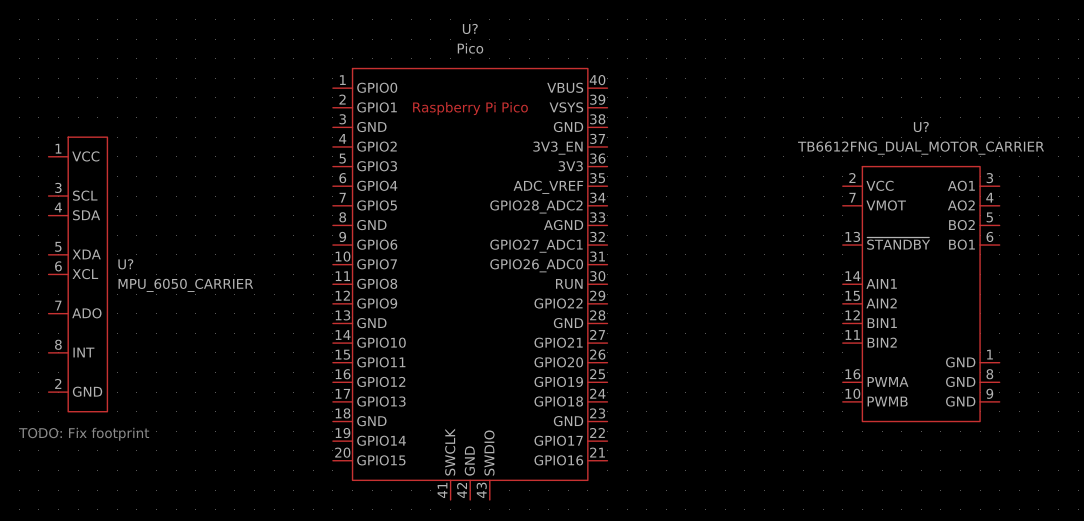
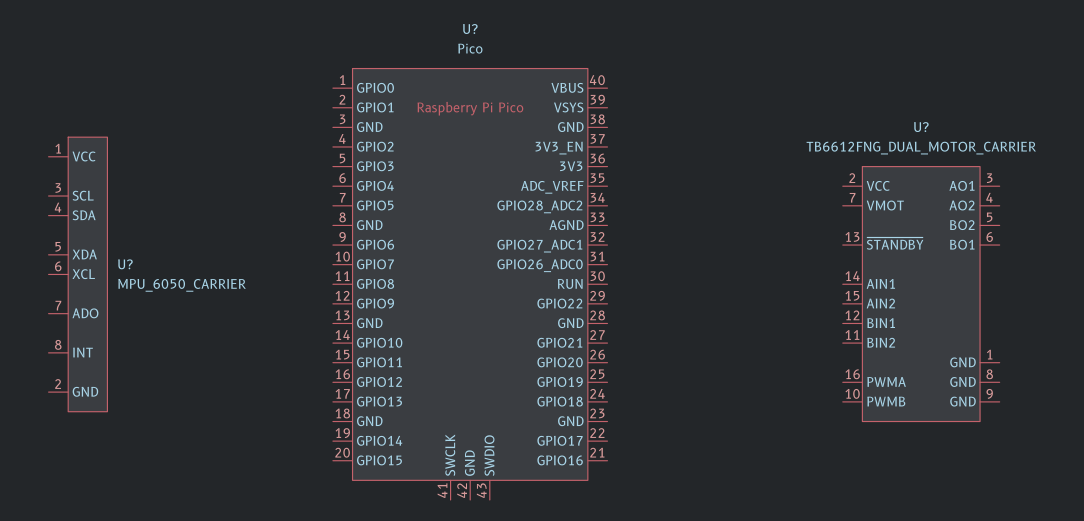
text: TODO: Fix footprint (84, 434) -> none

